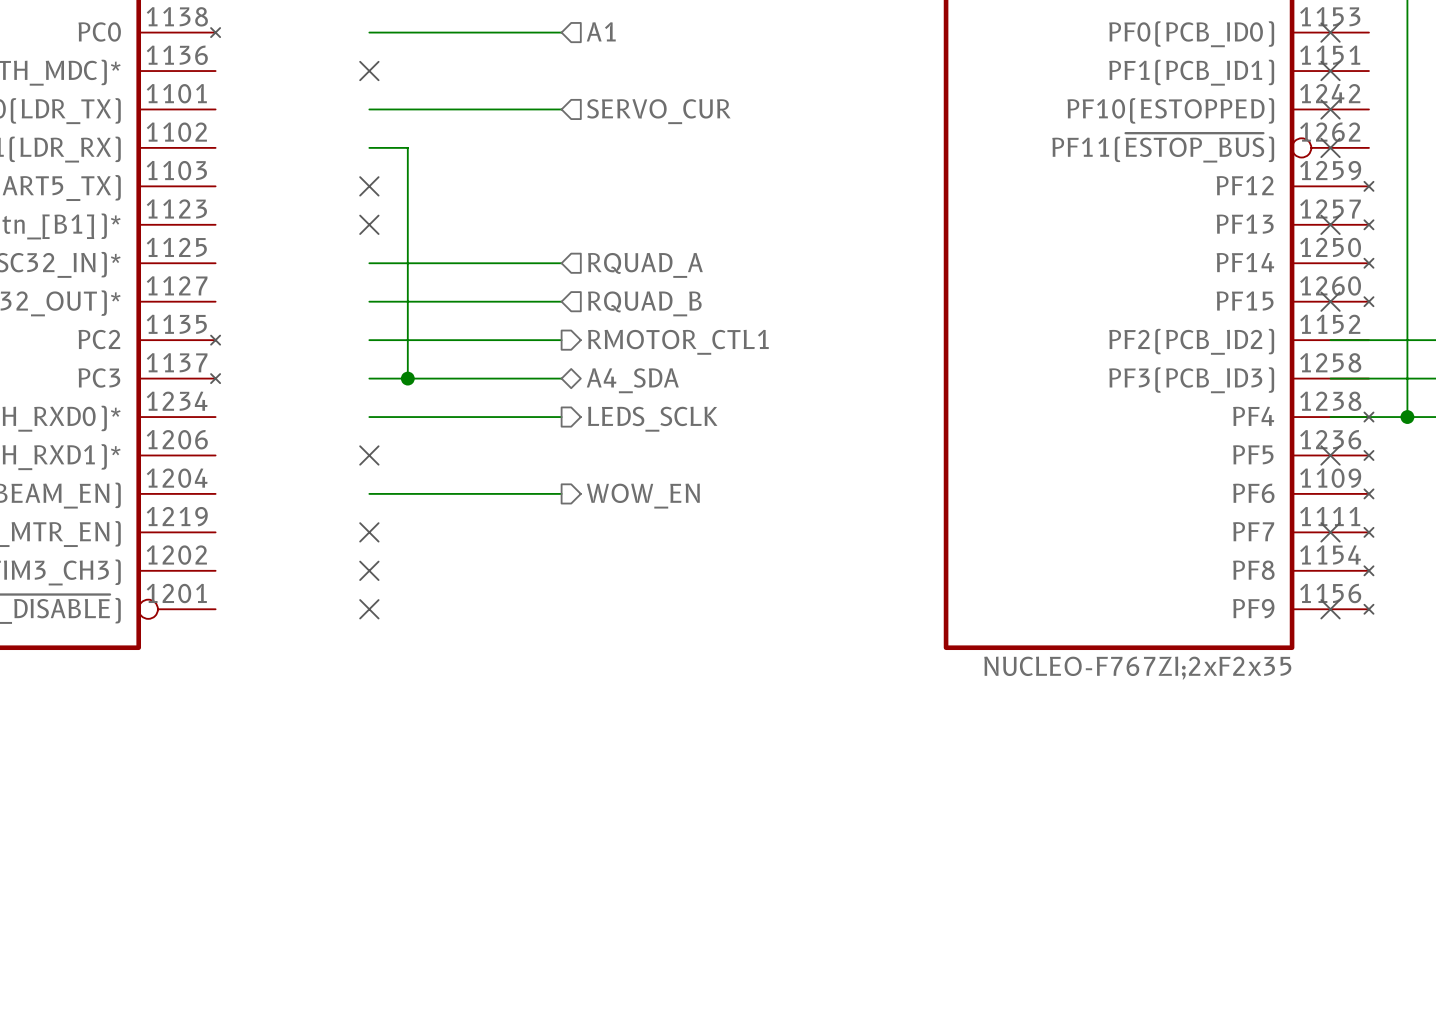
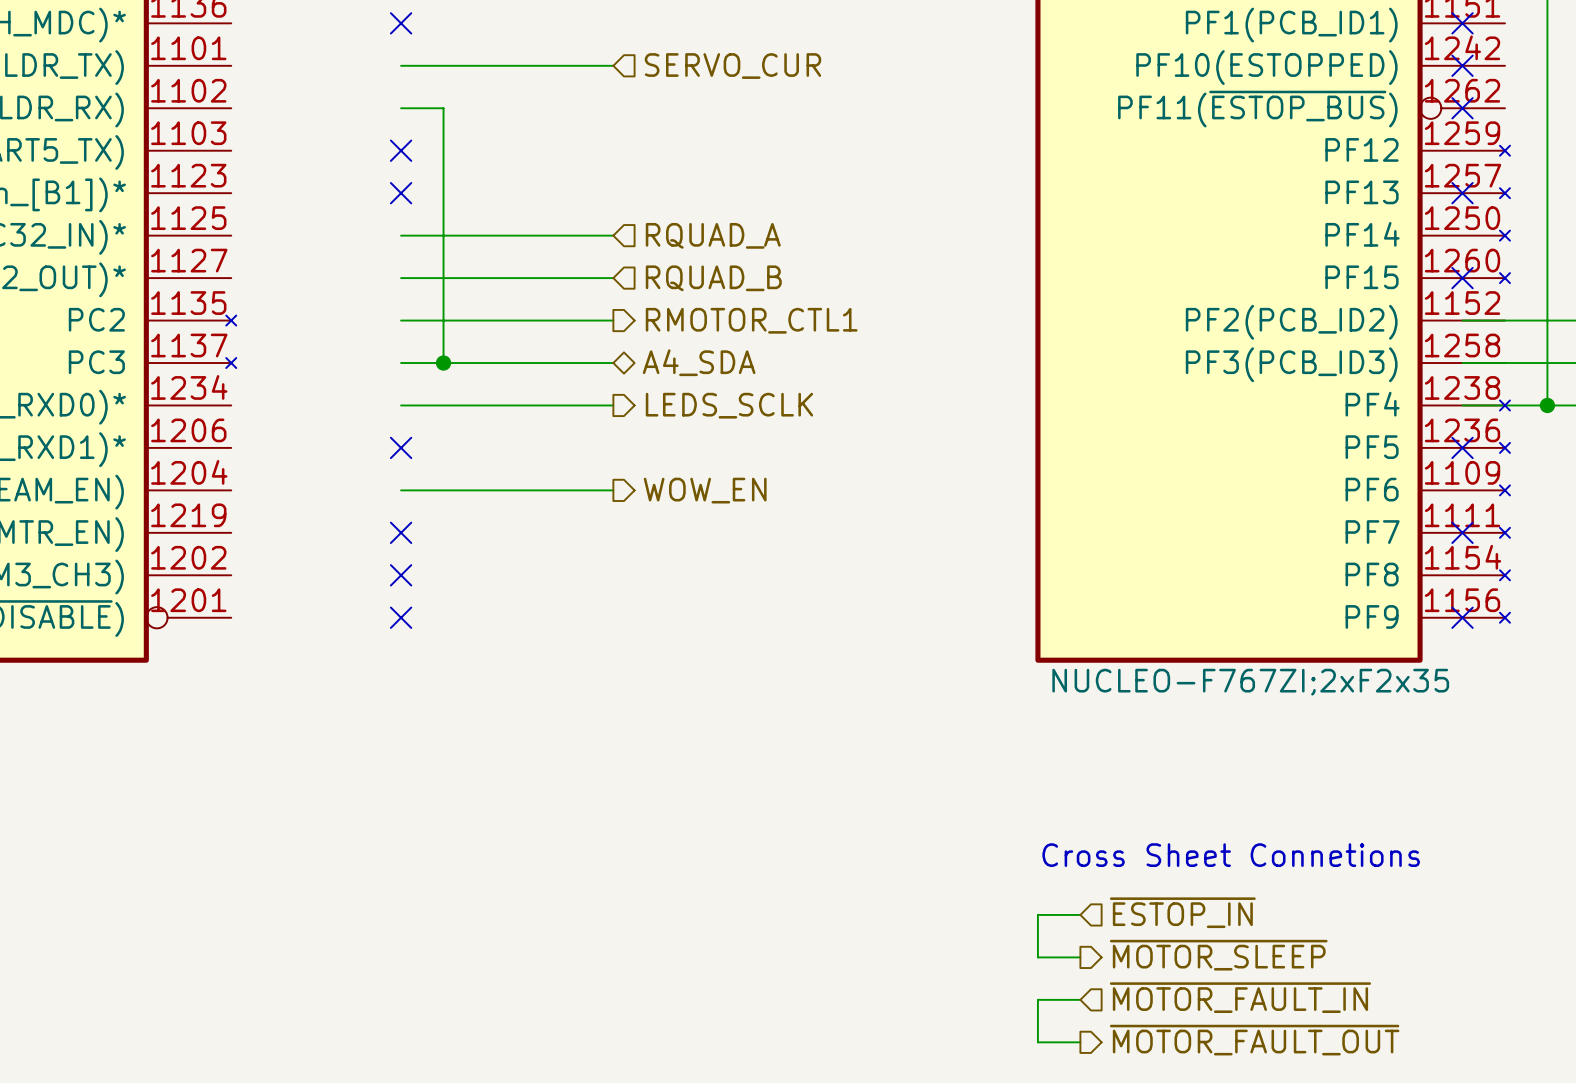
text: none -> Cross Sheet Connetions (1231, 855)
wire: none -> (1080, 914) (1037, 914) (1037, 957) (1080, 957)
hierarchical label: none -> ~{ESTOP_IN} (1182, 912)
hierarchical label: none -> ~{MOTOR_SLEEP} (1218, 955)
wire: none -> (1080, 999) (1037, 999) (1037, 1042) (1080, 1042)
hierarchical label: none -> ~{MOTOR_FAULT_IN} (1240, 997)
hierarchical label: none -> ~{MOTOR_FAULT_OUT} (1254, 1040)

